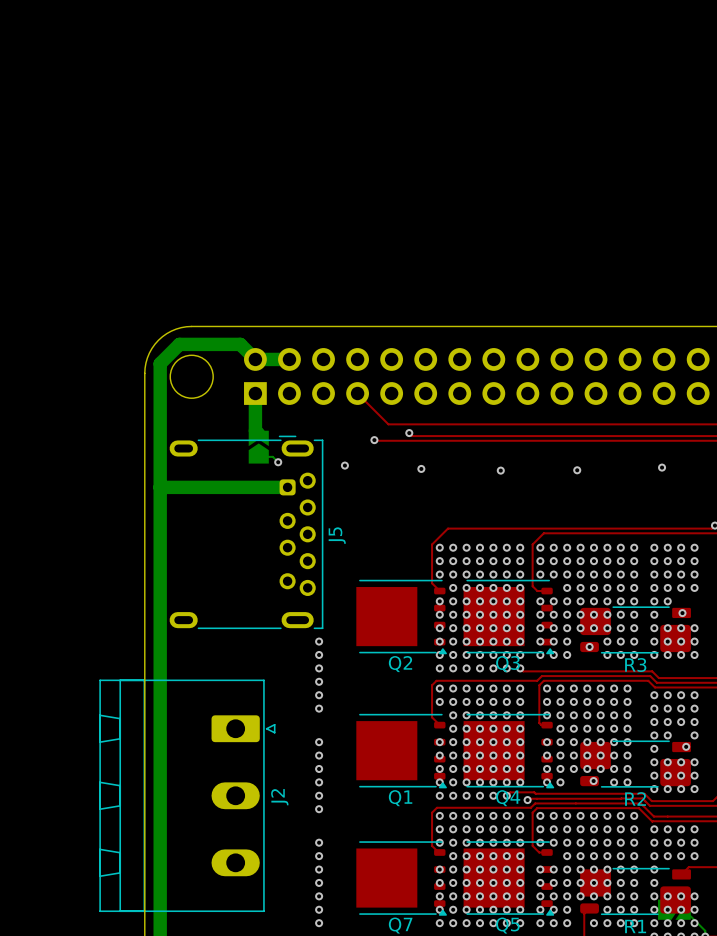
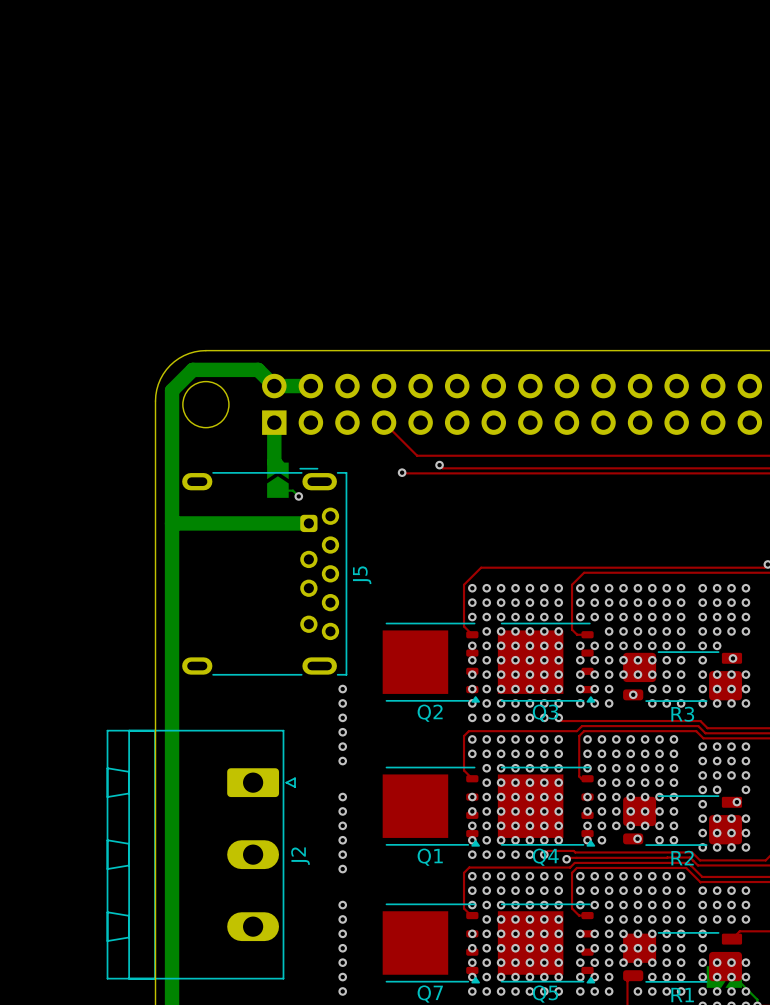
via: (344, 465) -> none
via: (662, 467) -> none
via: (421, 468) -> none
via: (500, 470) -> none
via: (577, 470) -> none

